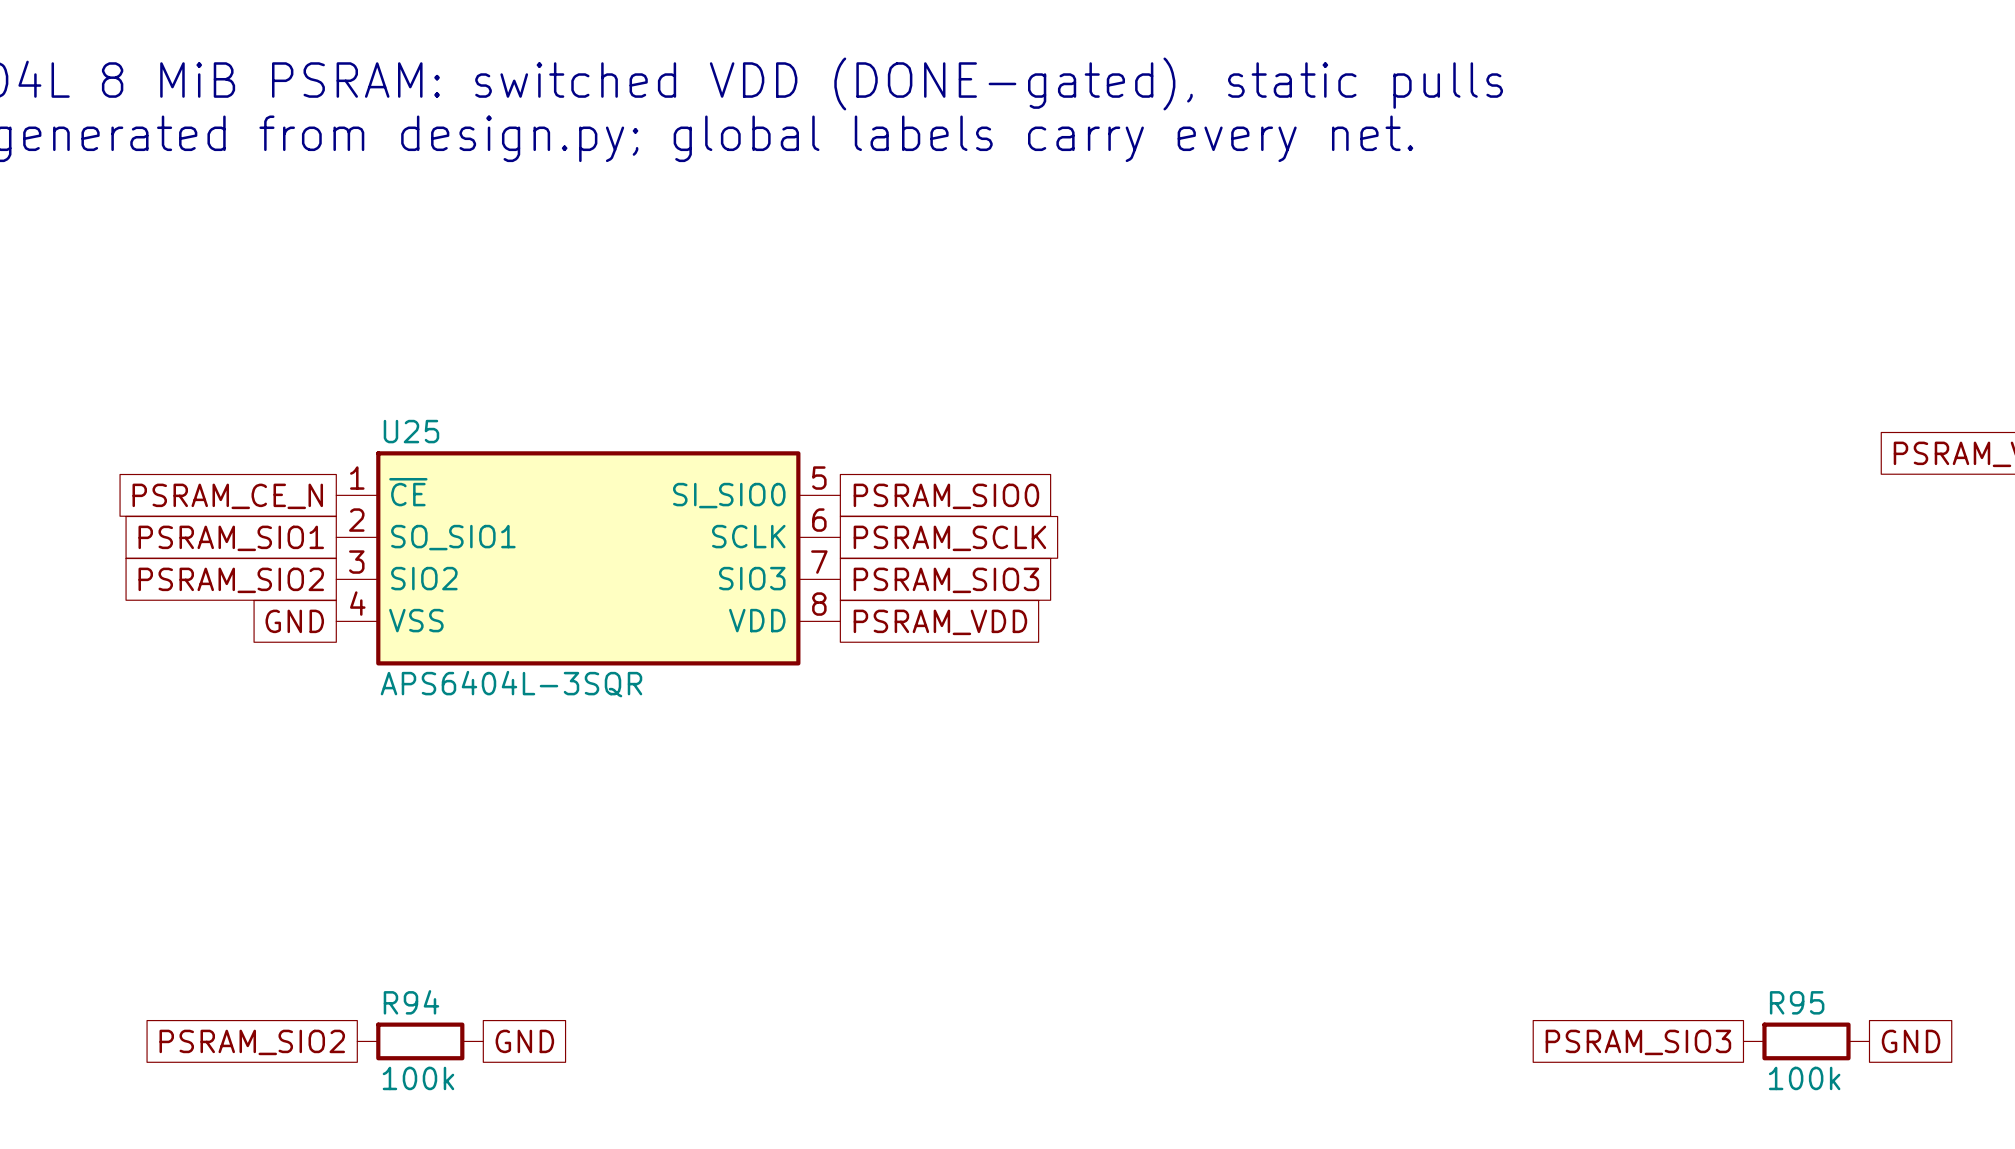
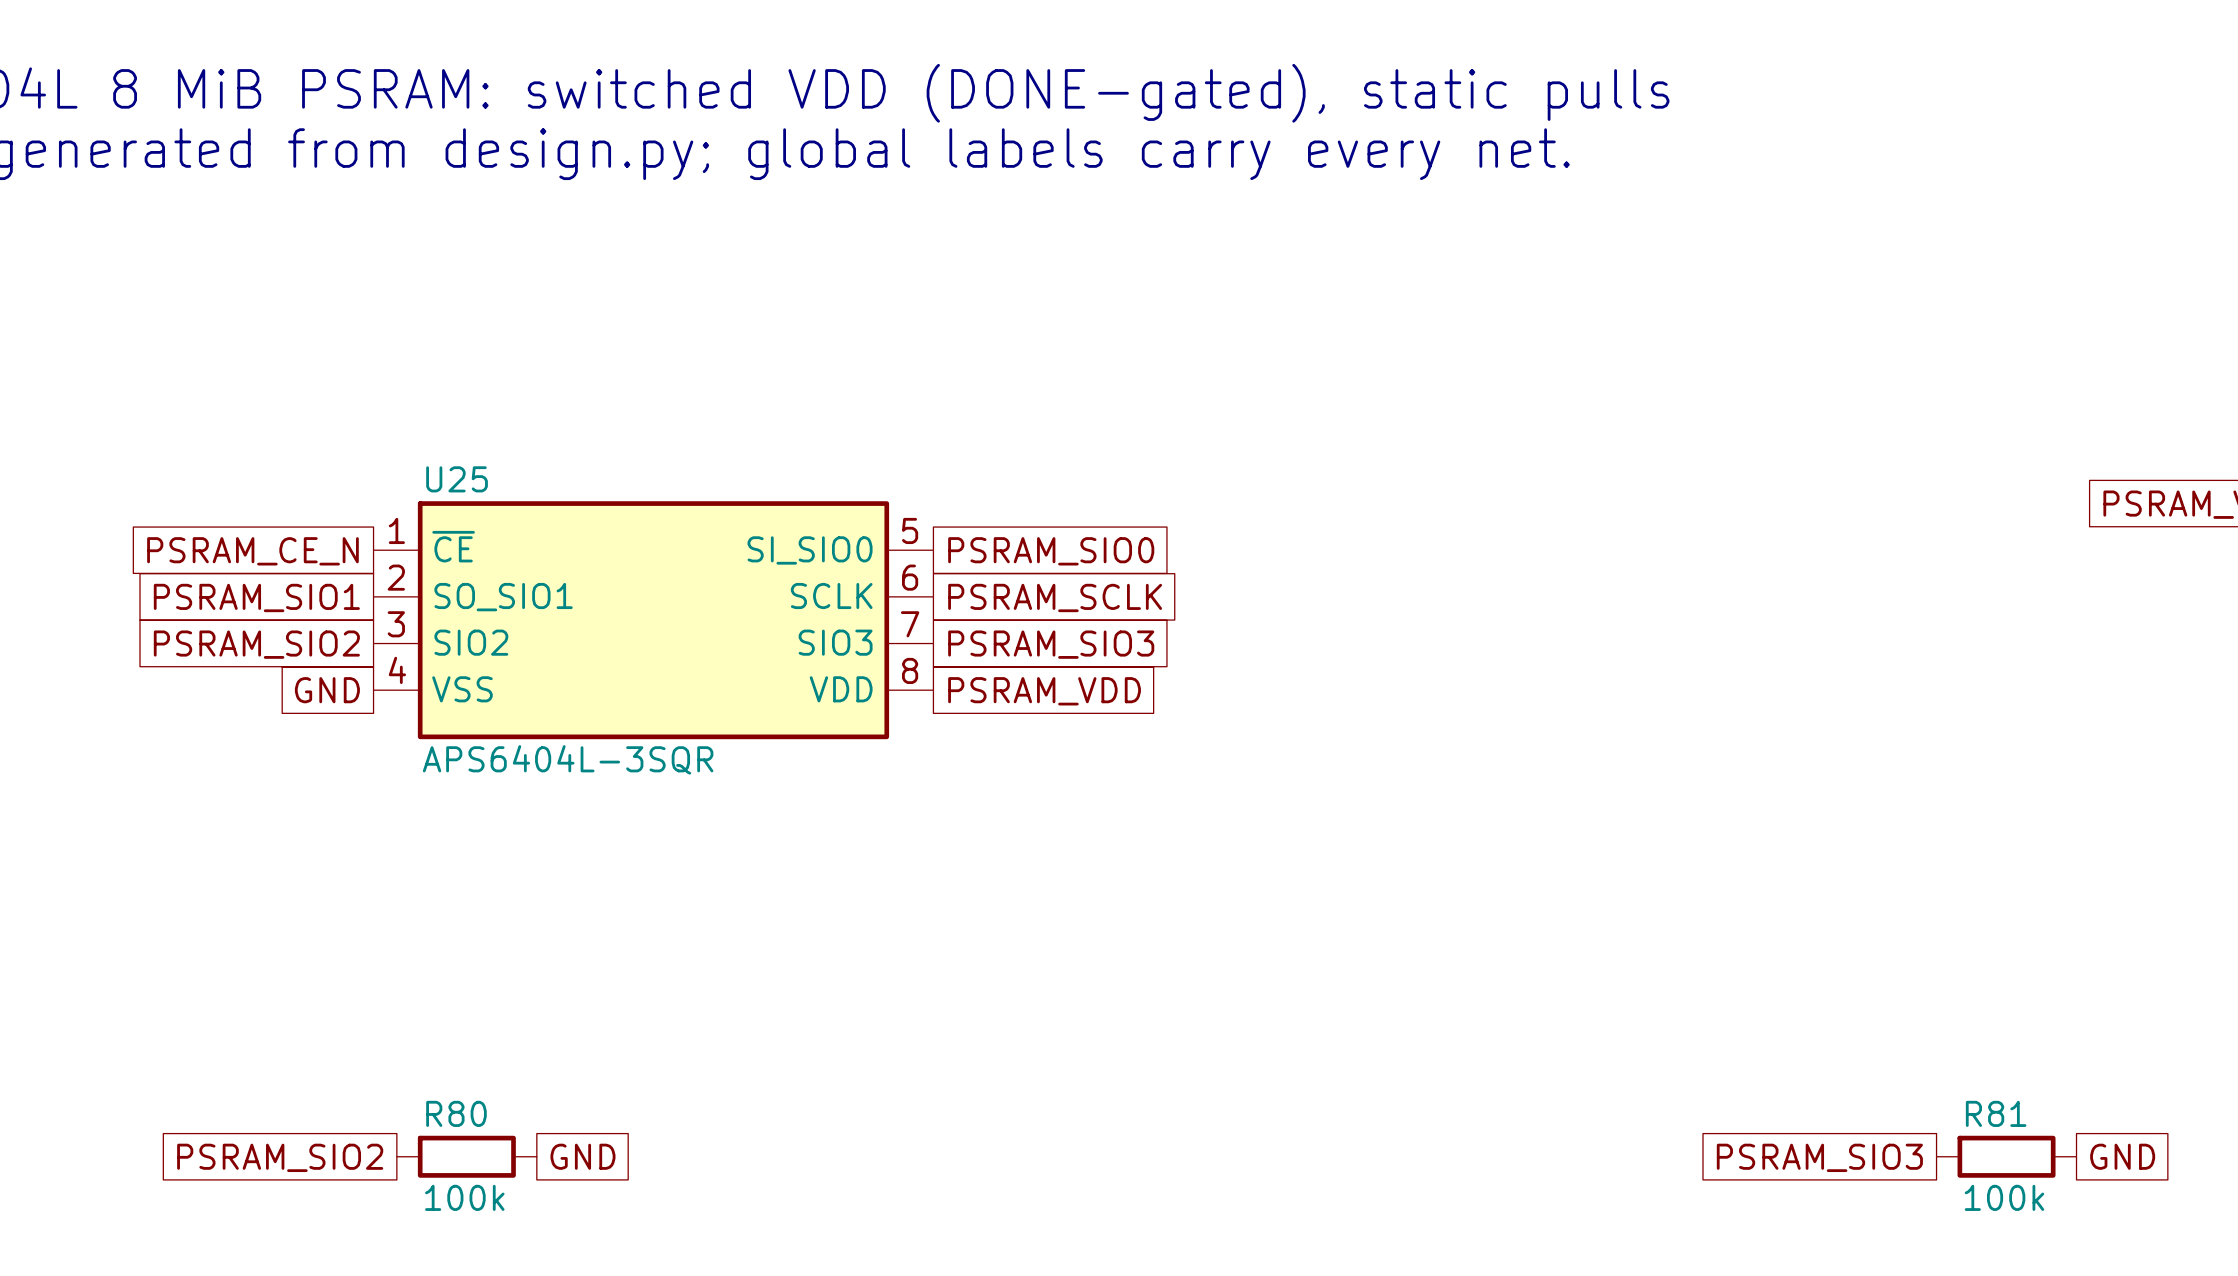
R94 name: R94 (411, 1002) -> R80 (456, 1113)
R95 name: R95 (1797, 1002) -> R81 (1996, 1113)

